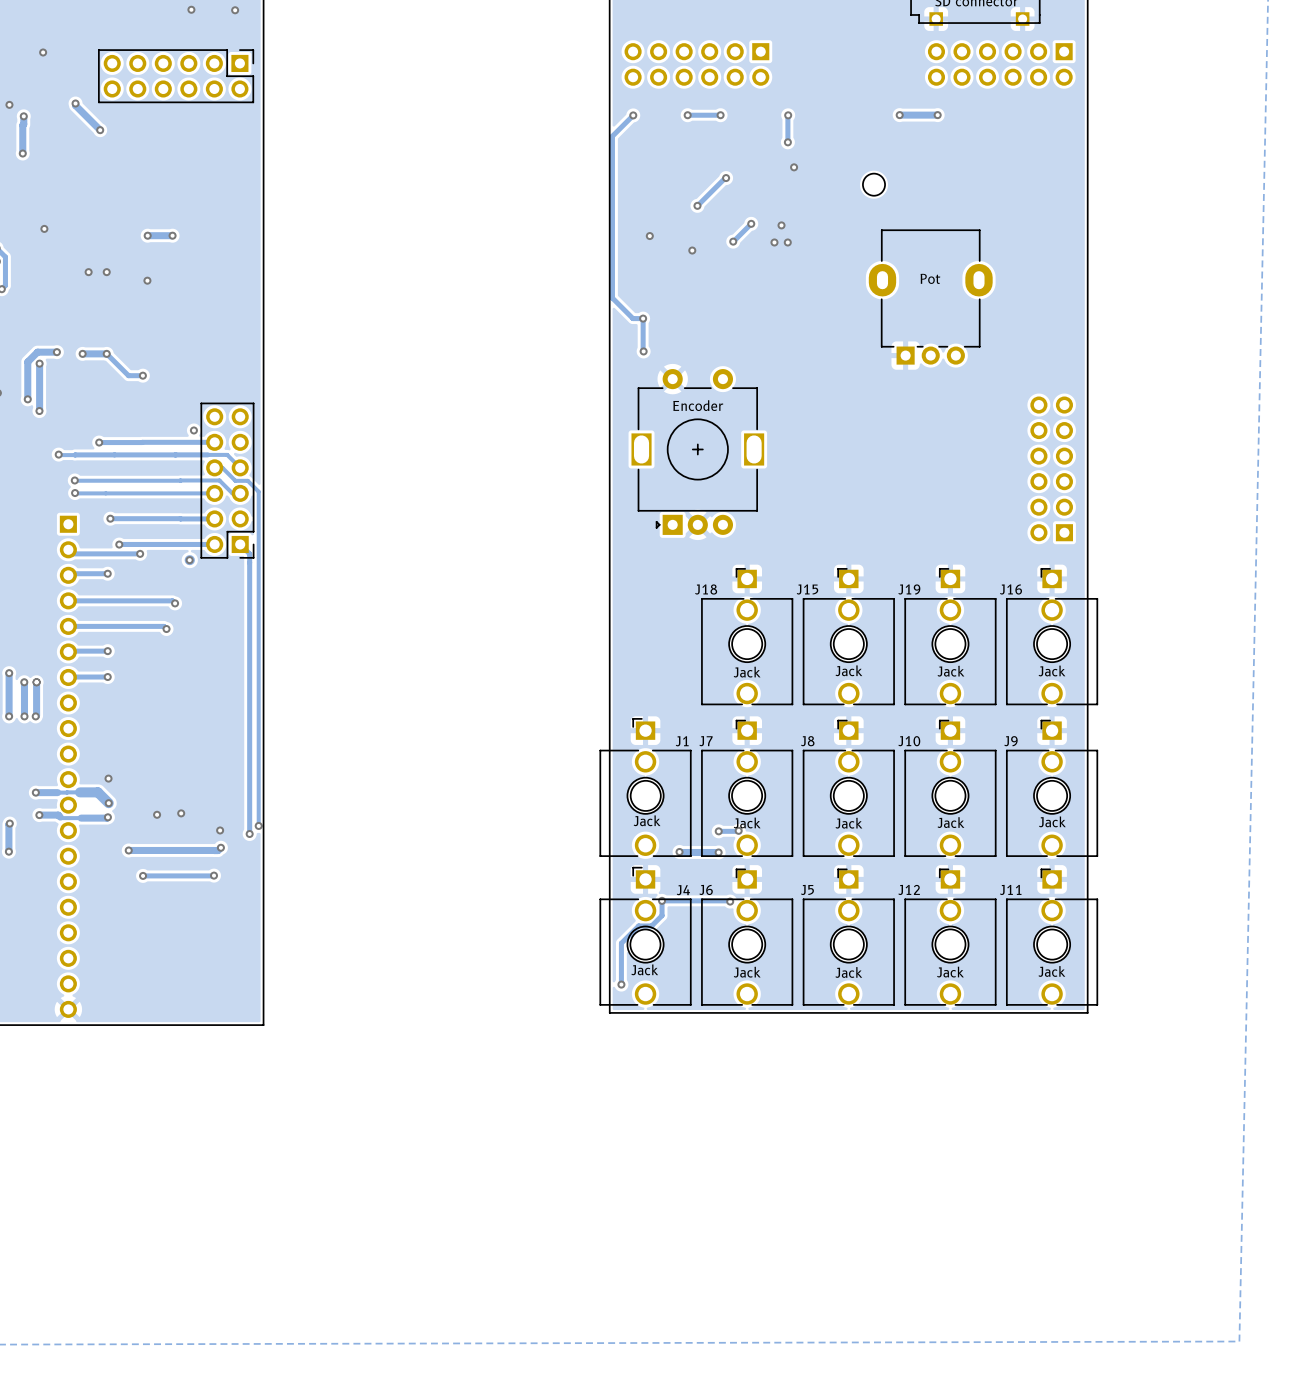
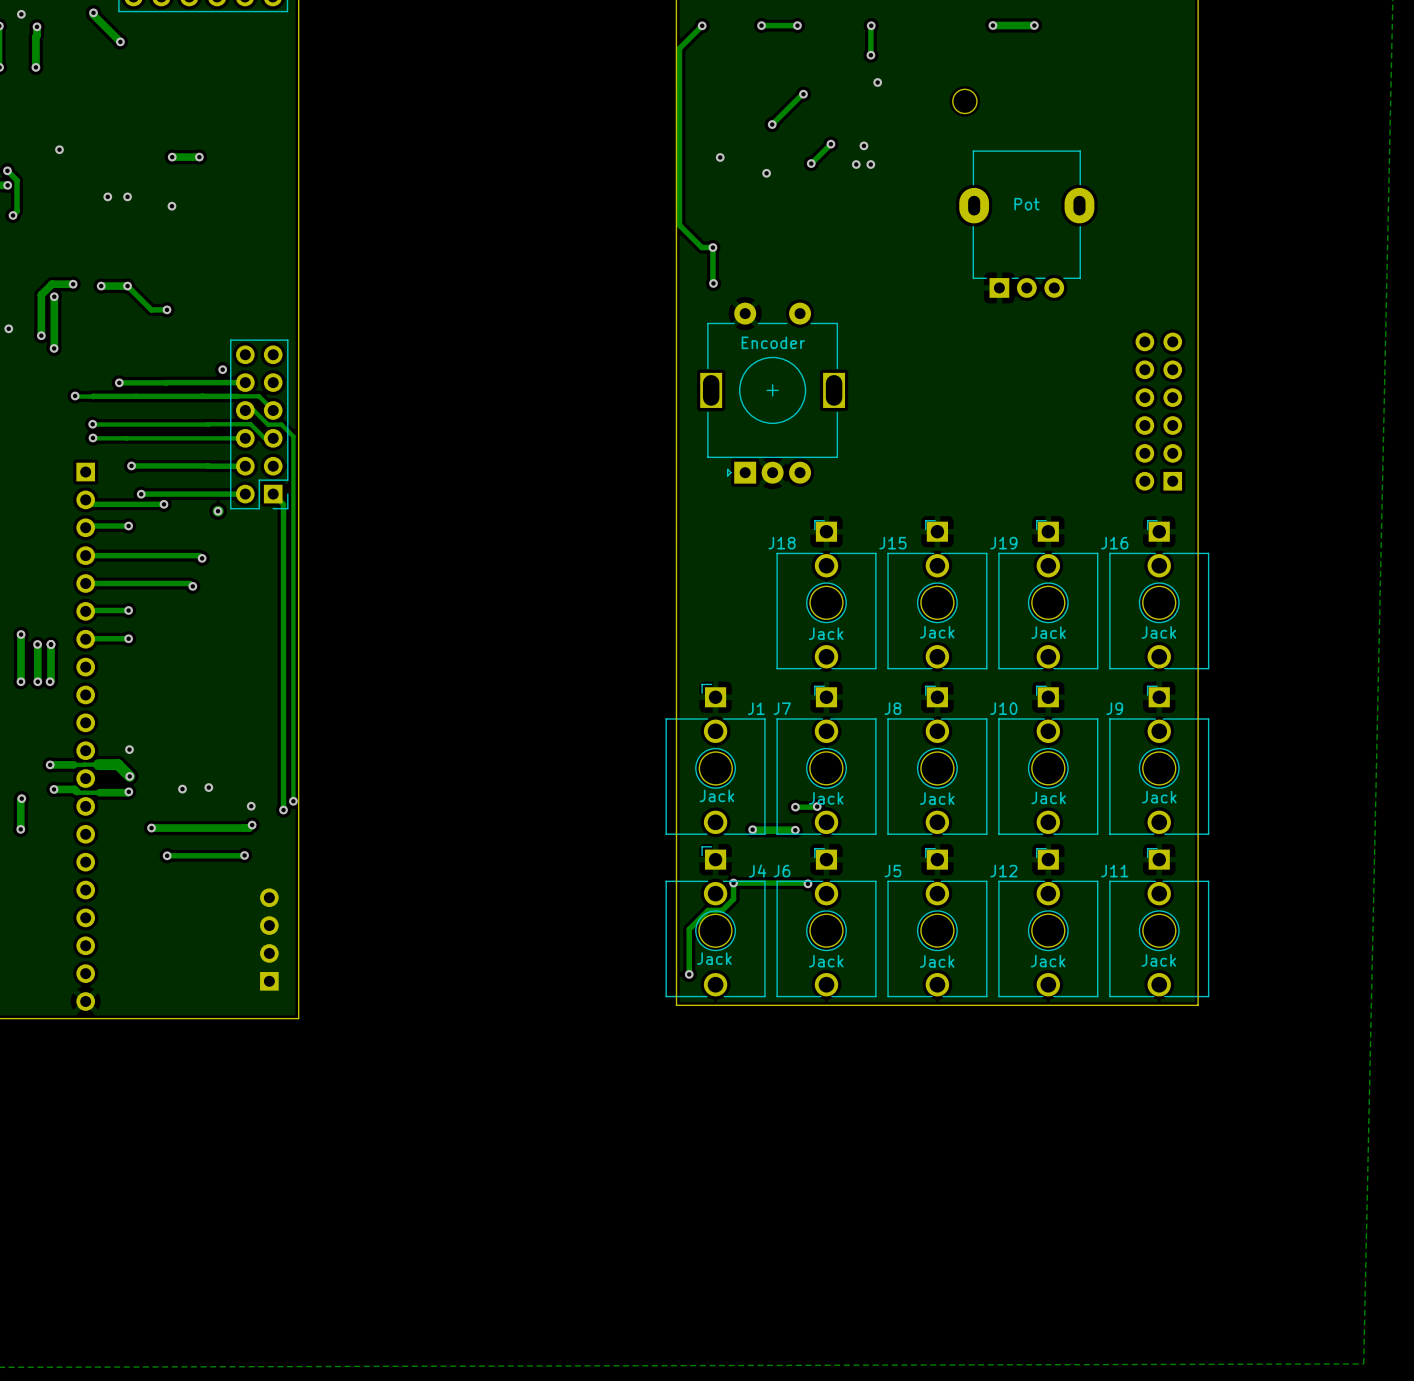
part: none -> (269, 939)

